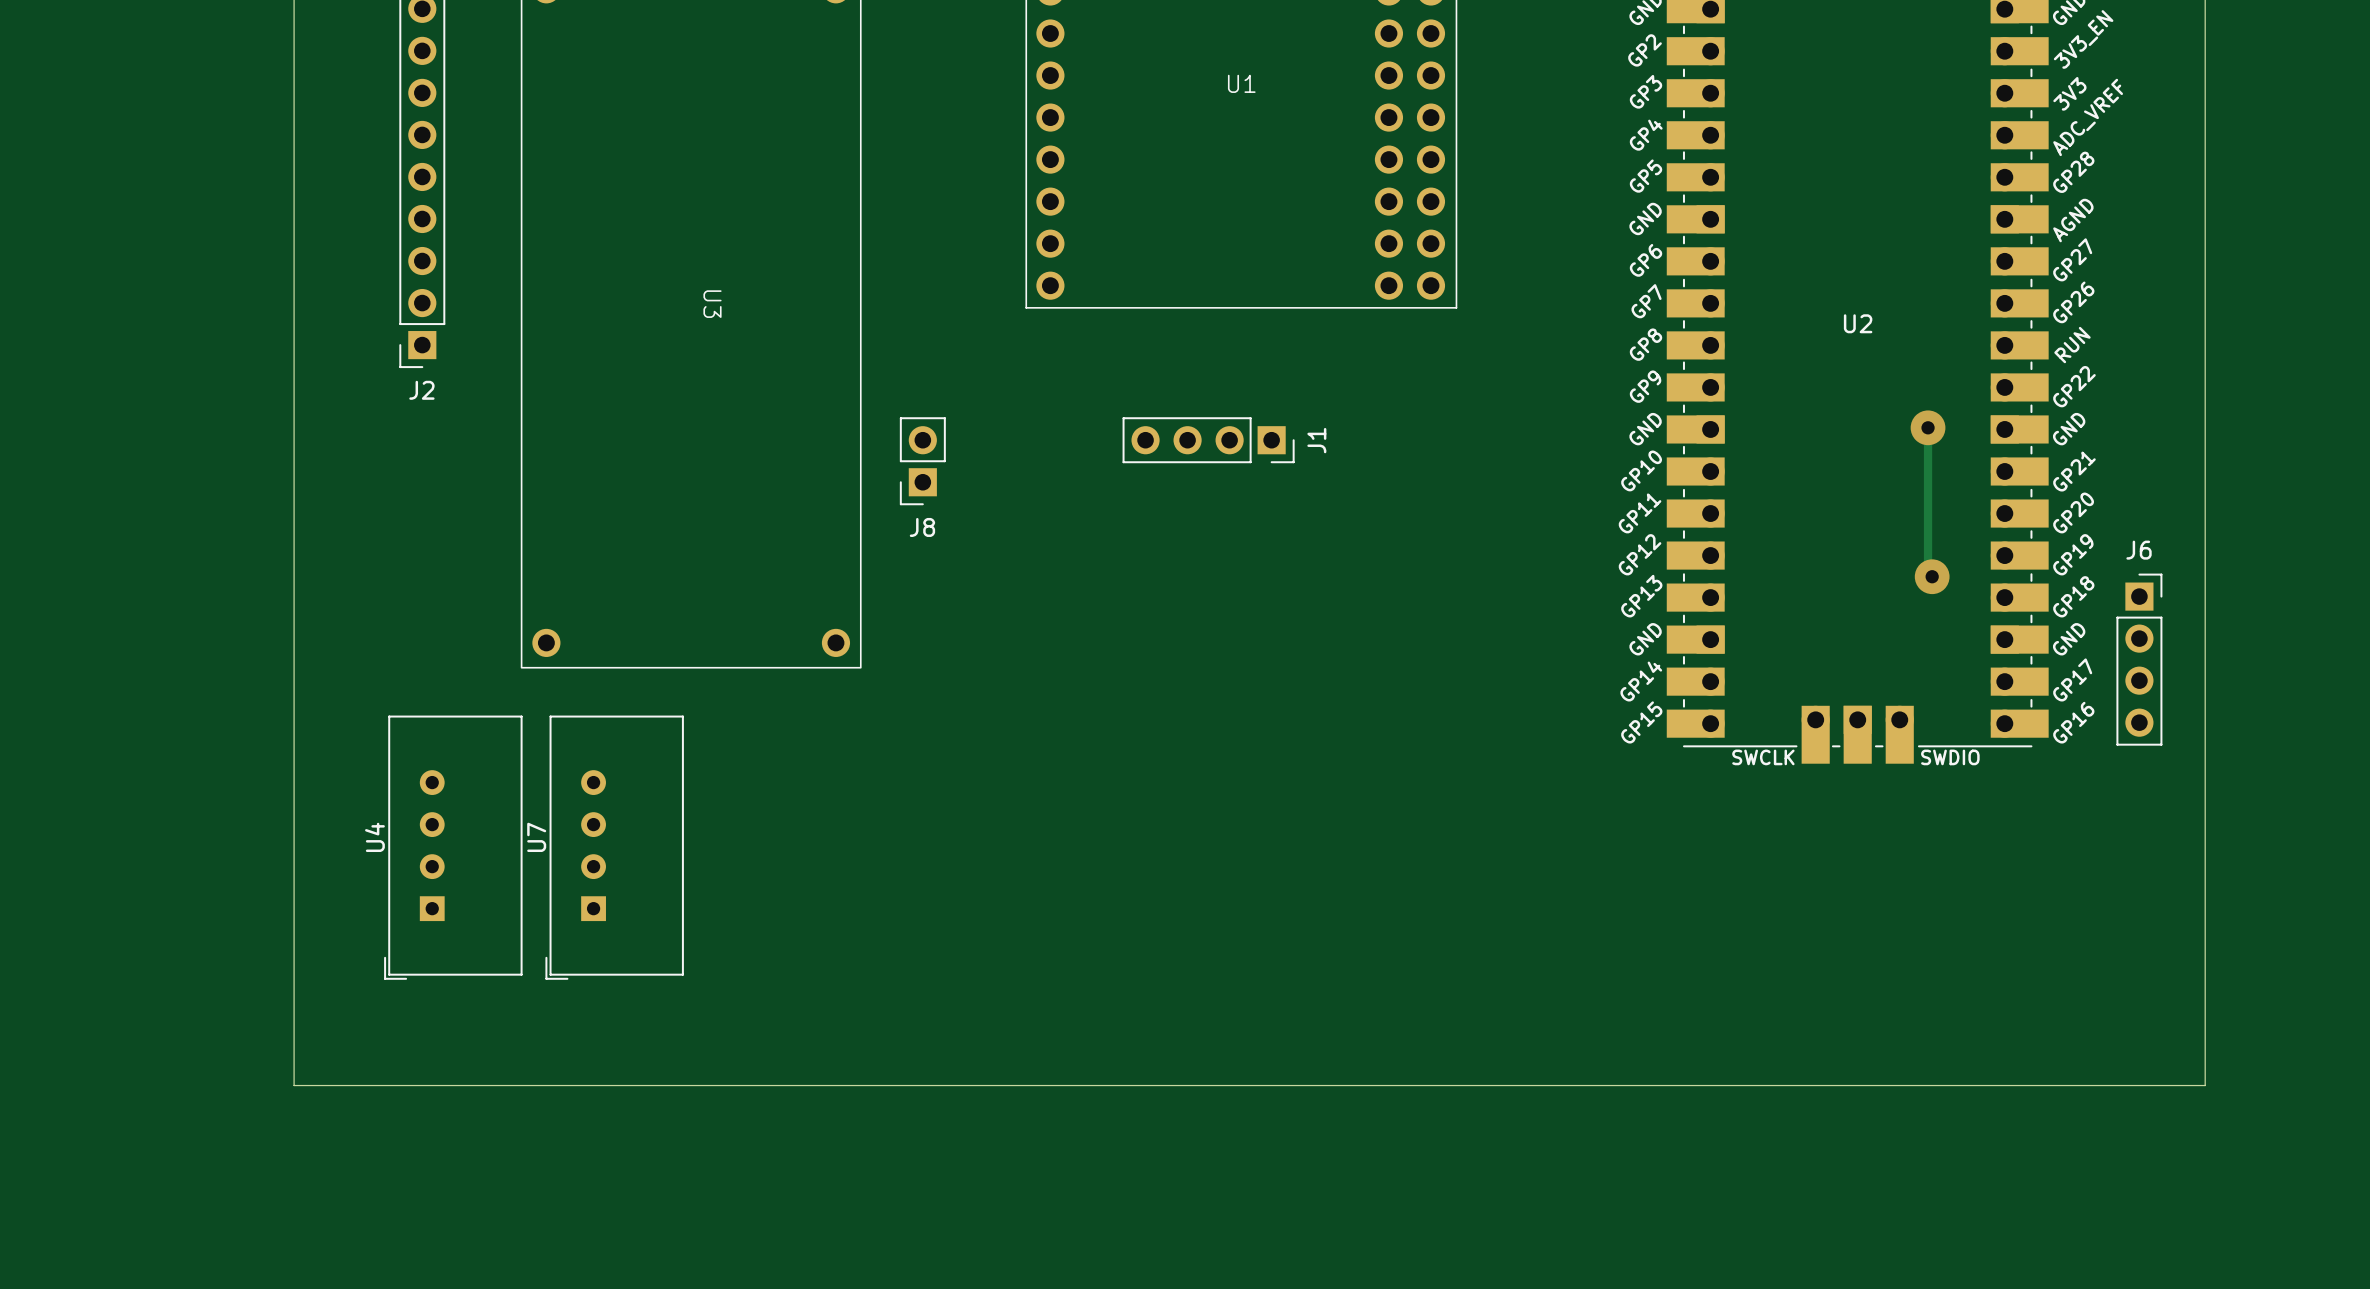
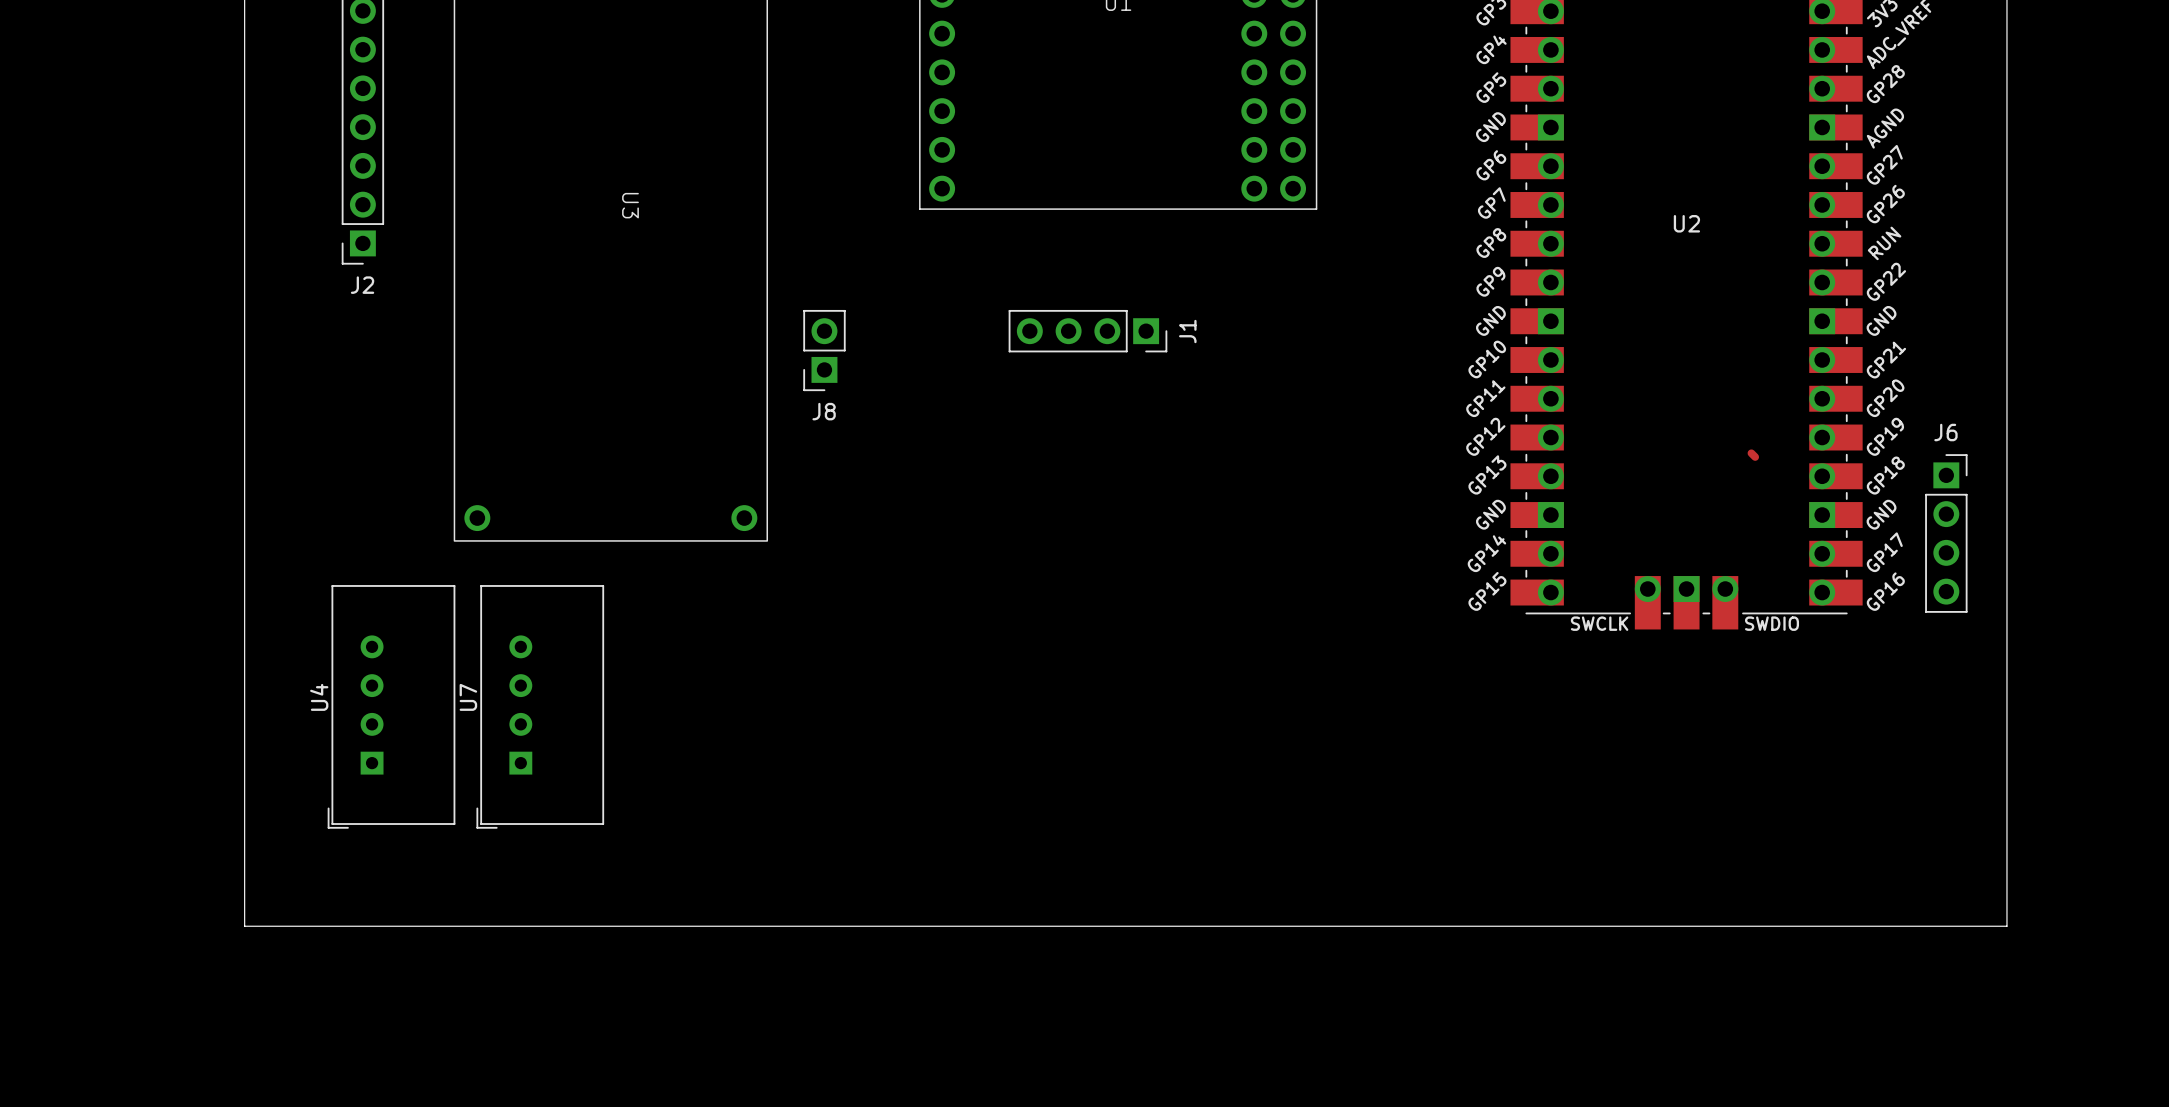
track: (1928, 427) (1928, 572) -> none
via: (1928, 427) -> none
via: (1932, 576) -> none

